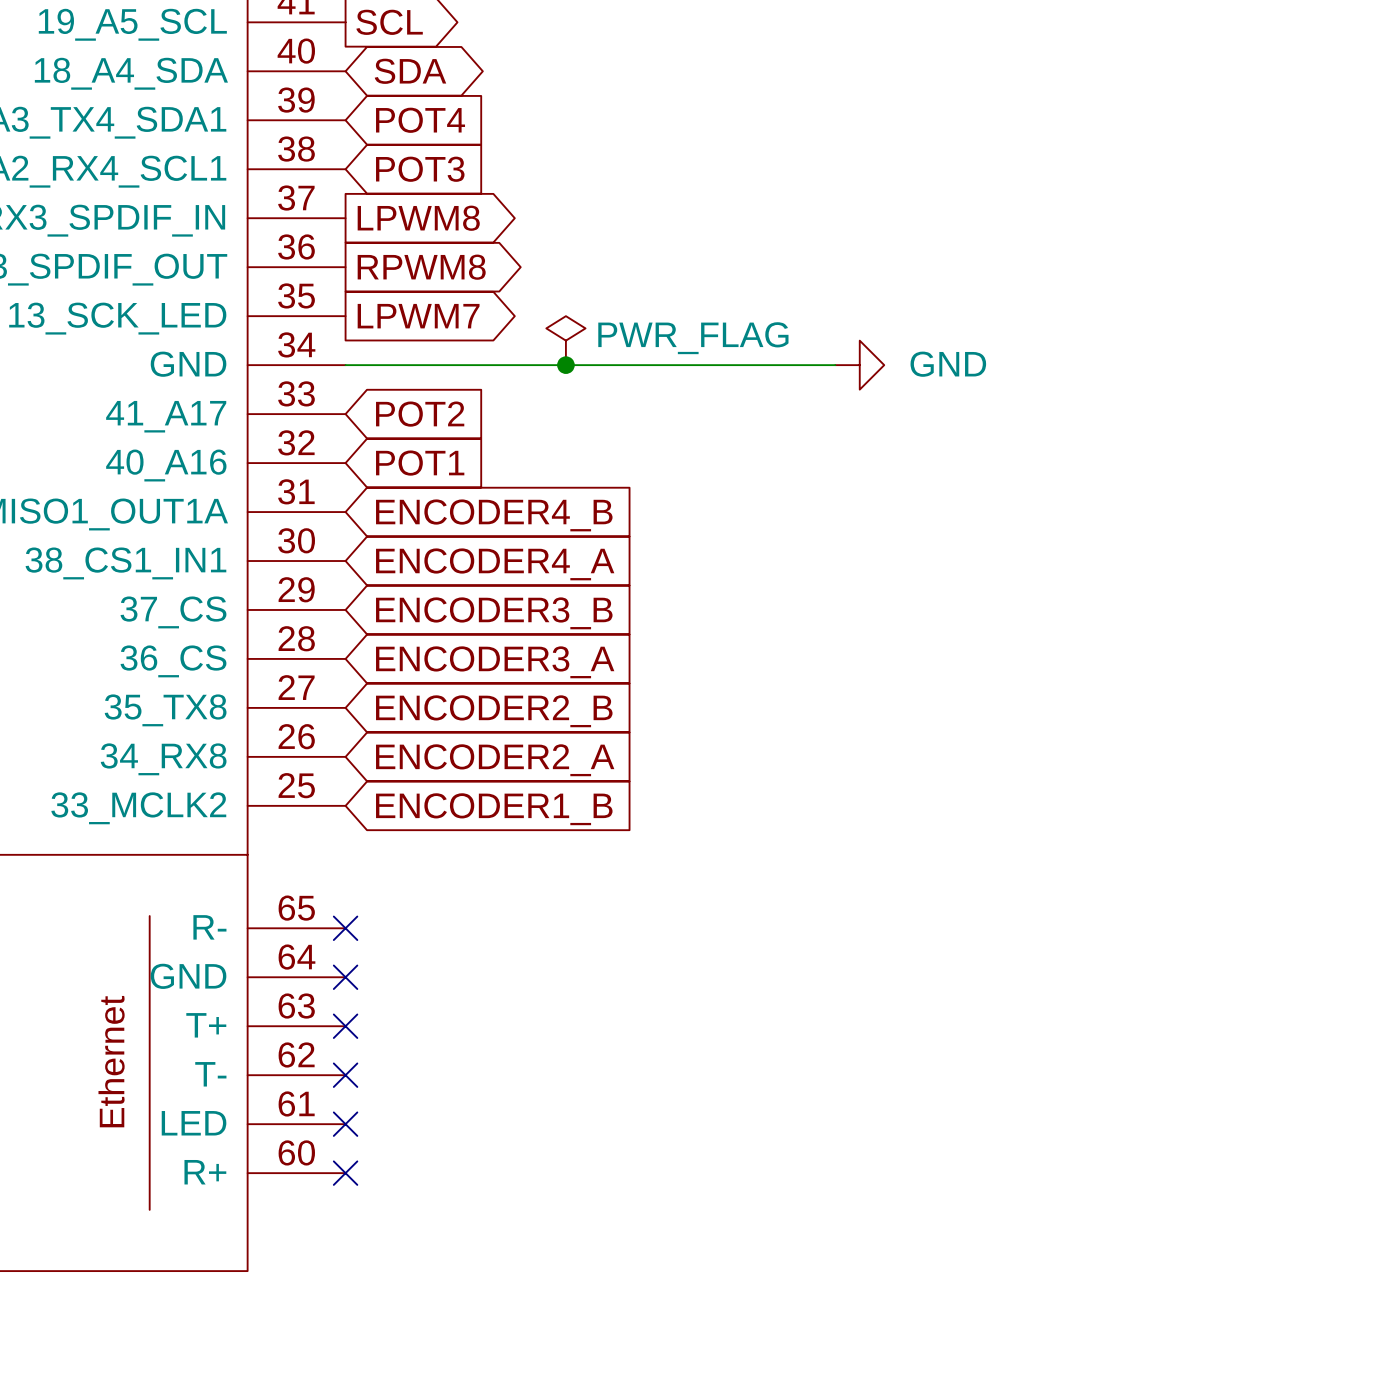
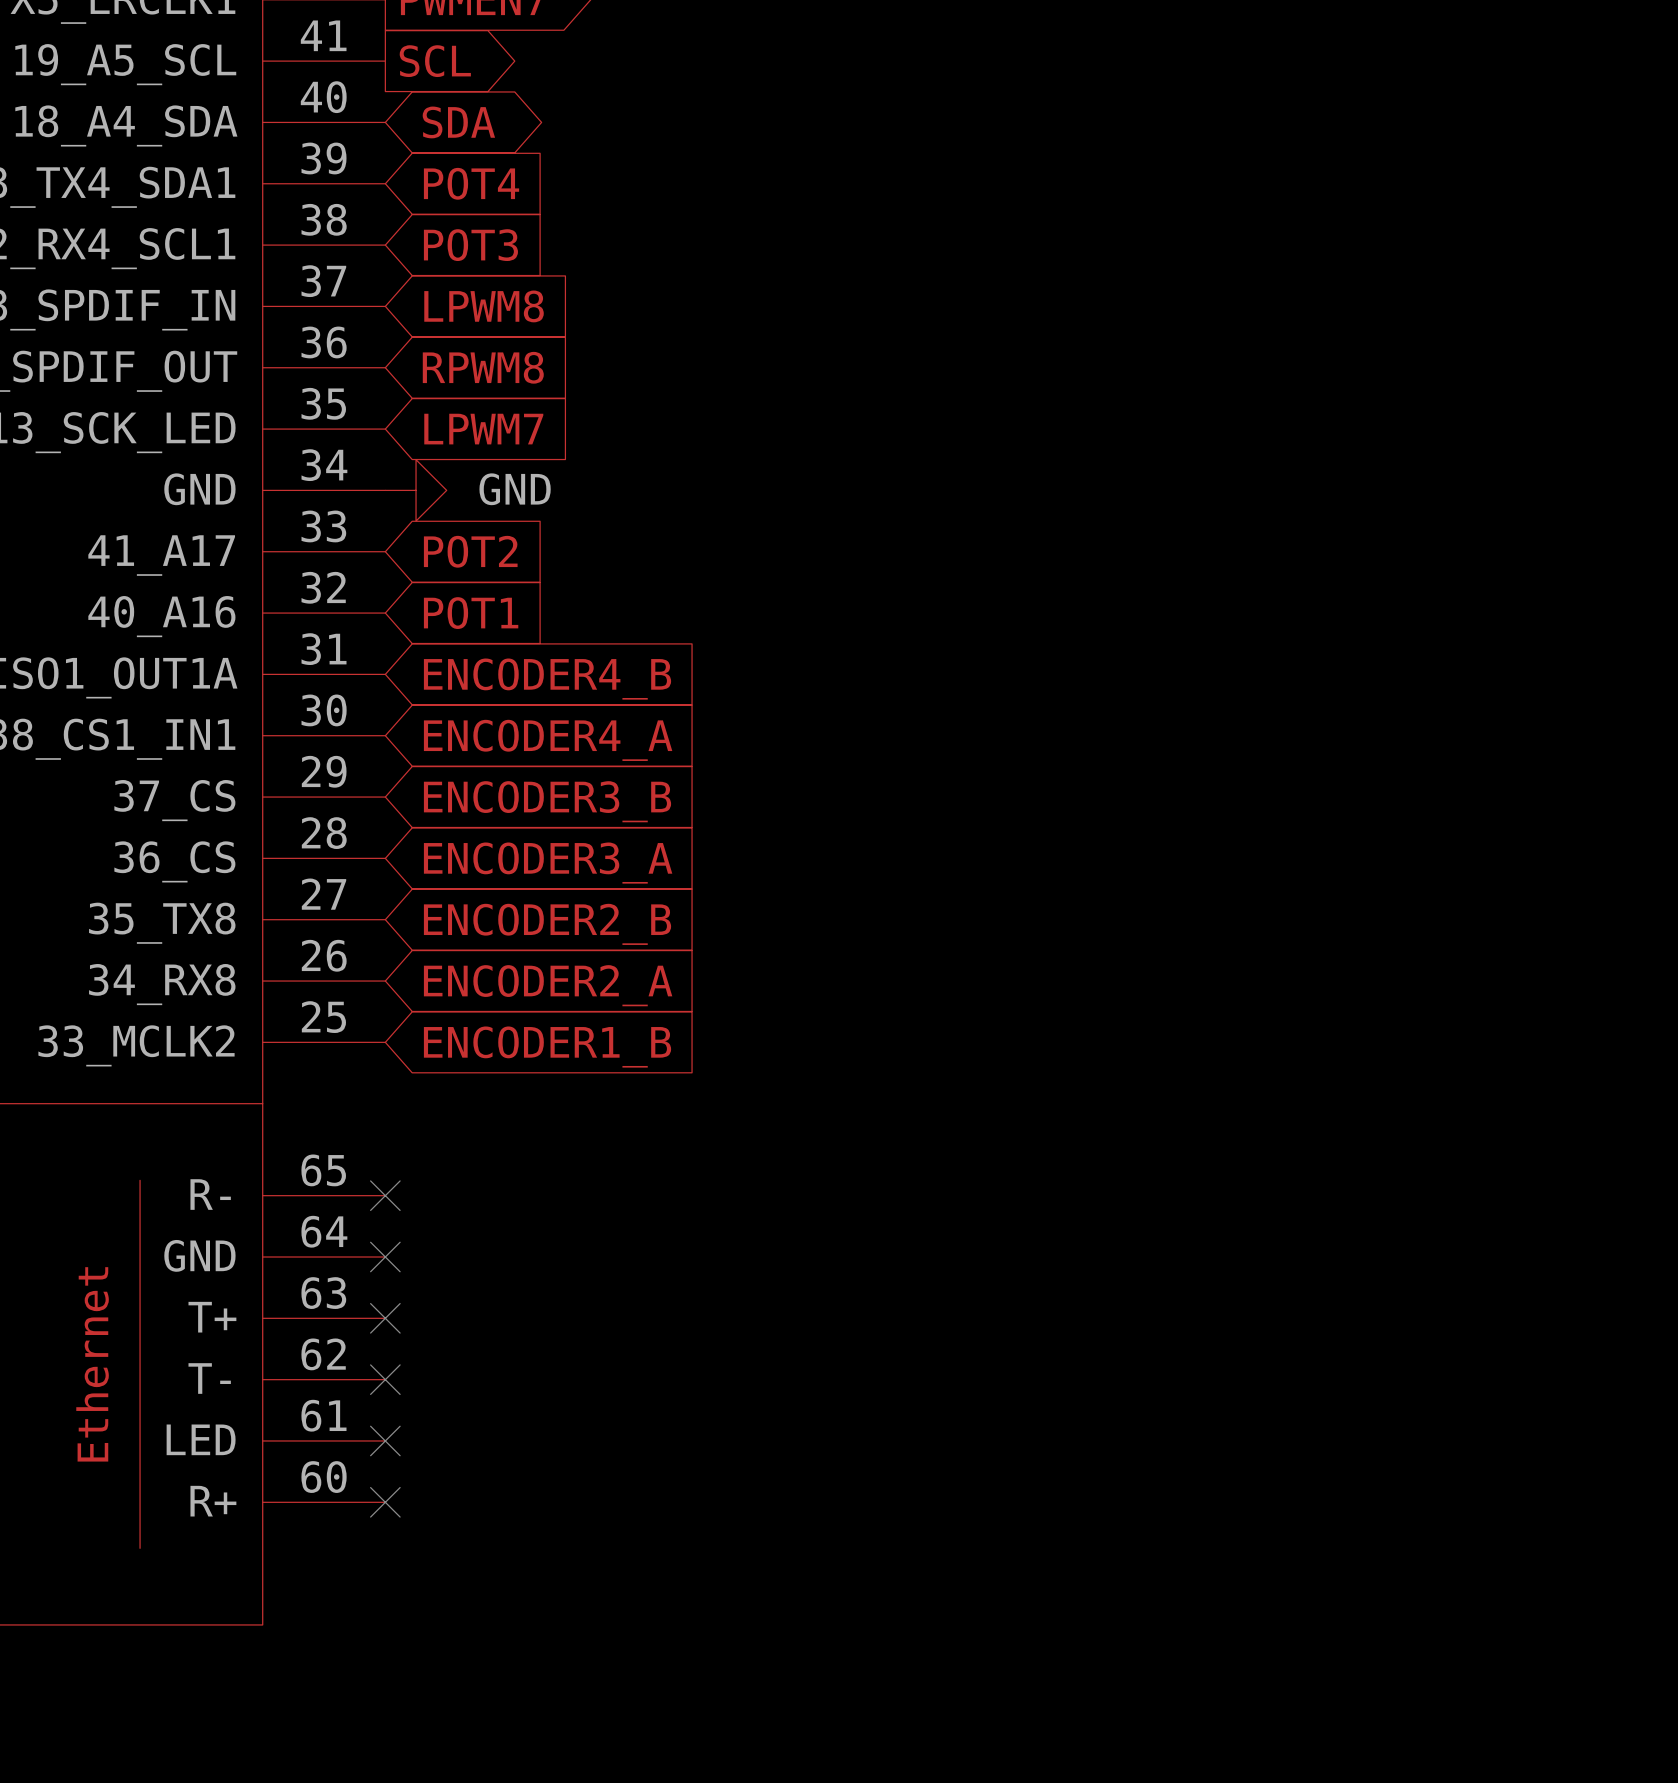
global label shape: output (418, 218) -> input (484, 306)
global label shape: output (421, 267) -> input (483, 367)
global label shape: output (418, 316) -> input (483, 429)
power symbol: PWR_FLAG (565, 340) -> none
wire: (345, 365) (835, 365) -> none
power symbol: none -> GND (416, 490)
junction: (565, 365) -> none
power symbol: GND (859, 365) -> none

